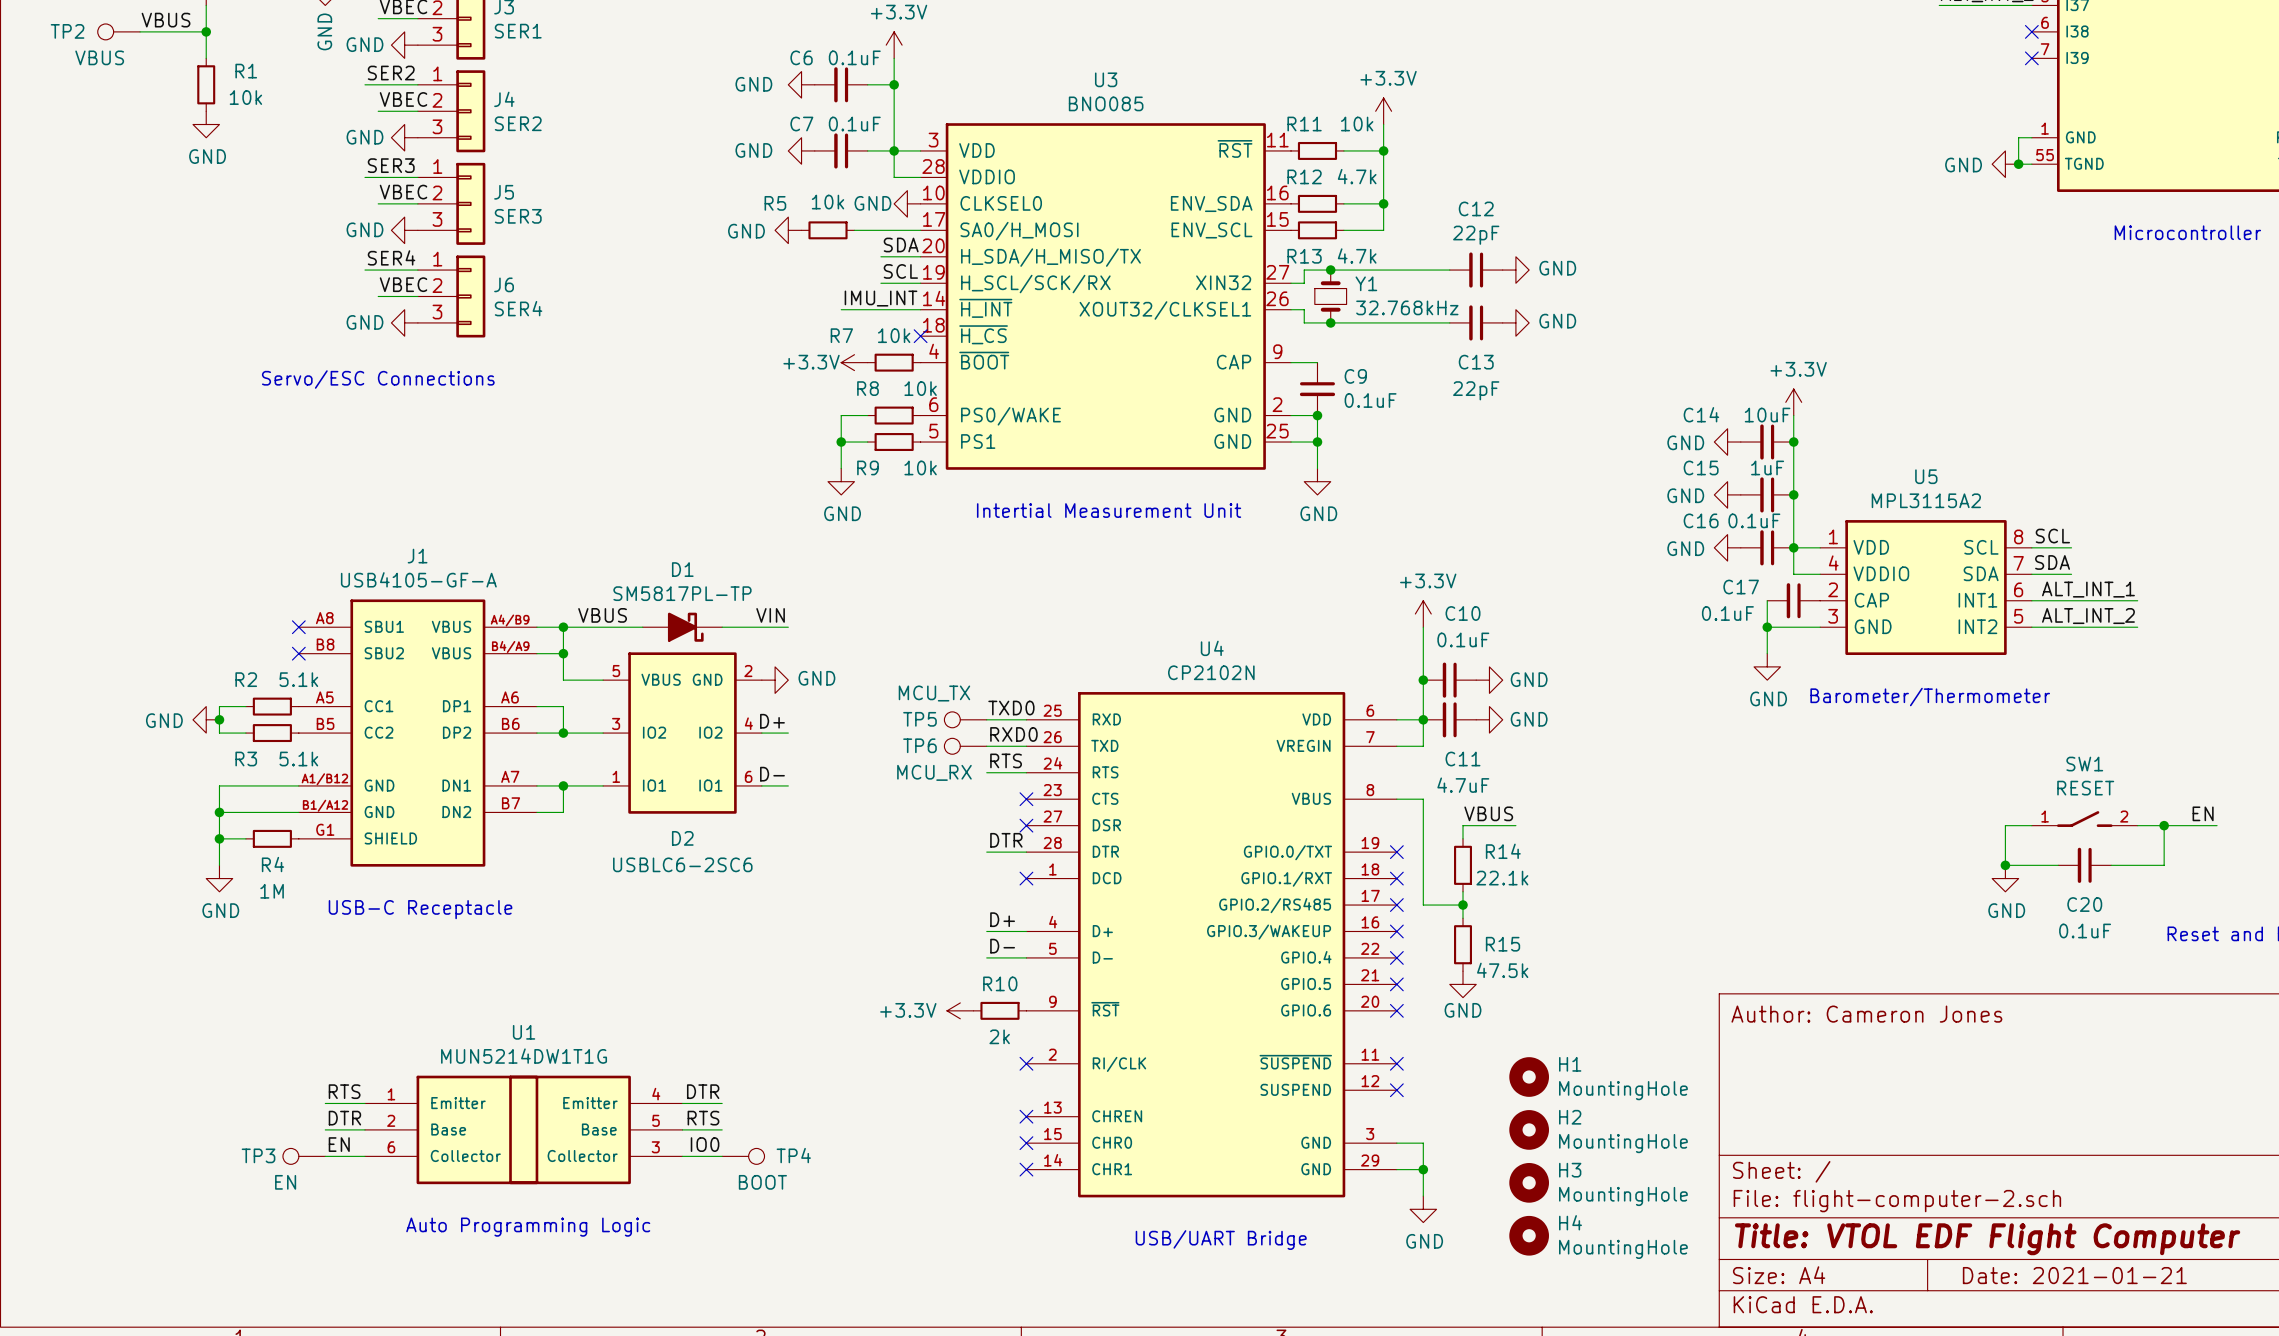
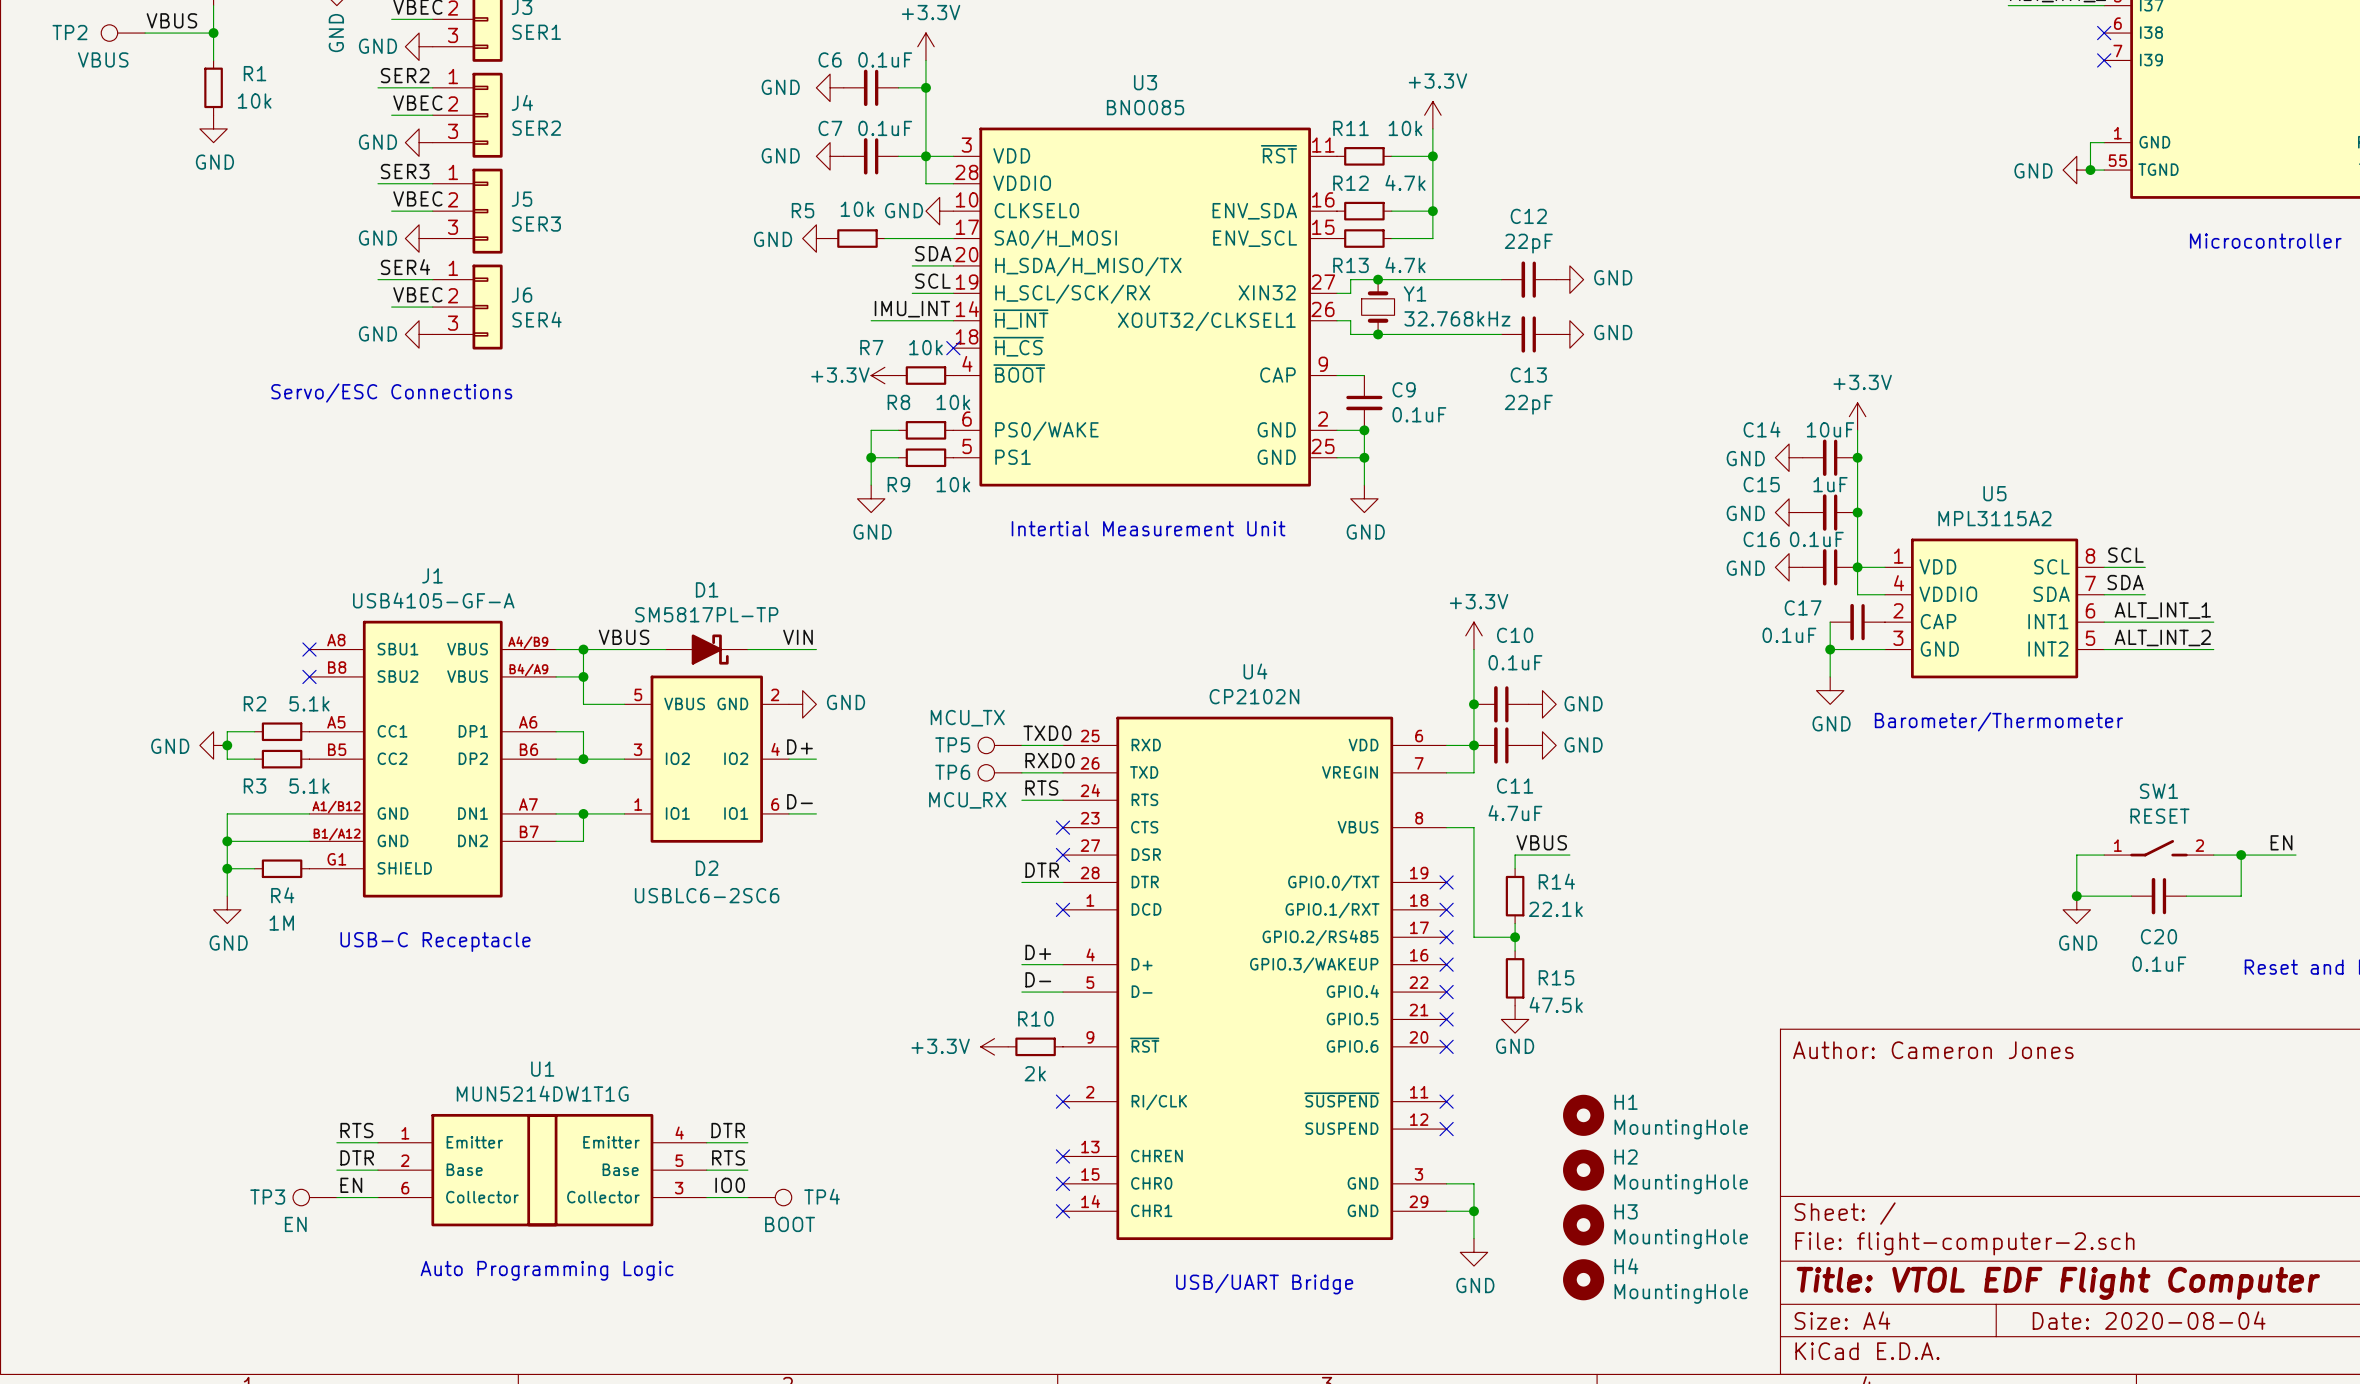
title block: Date: 2021-01-21 (2074, 1275) -> Date: 2020-08-04 (2149, 1320)

